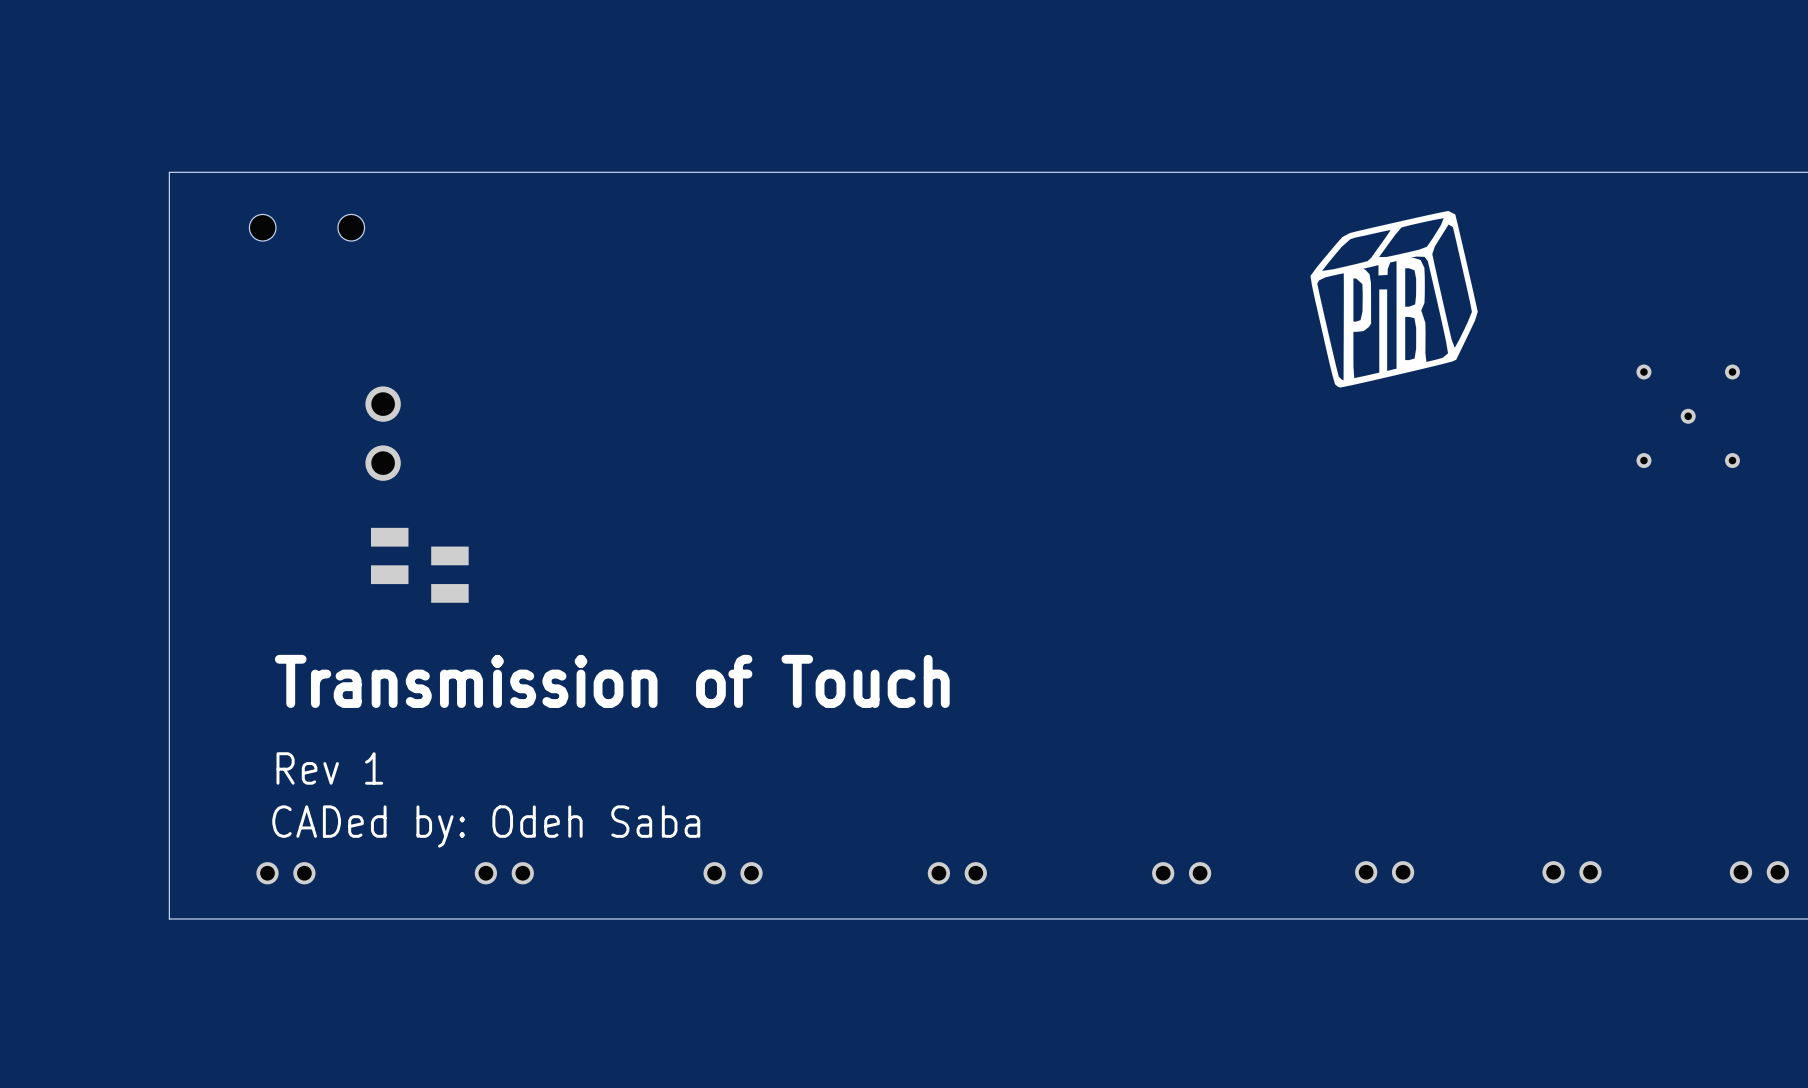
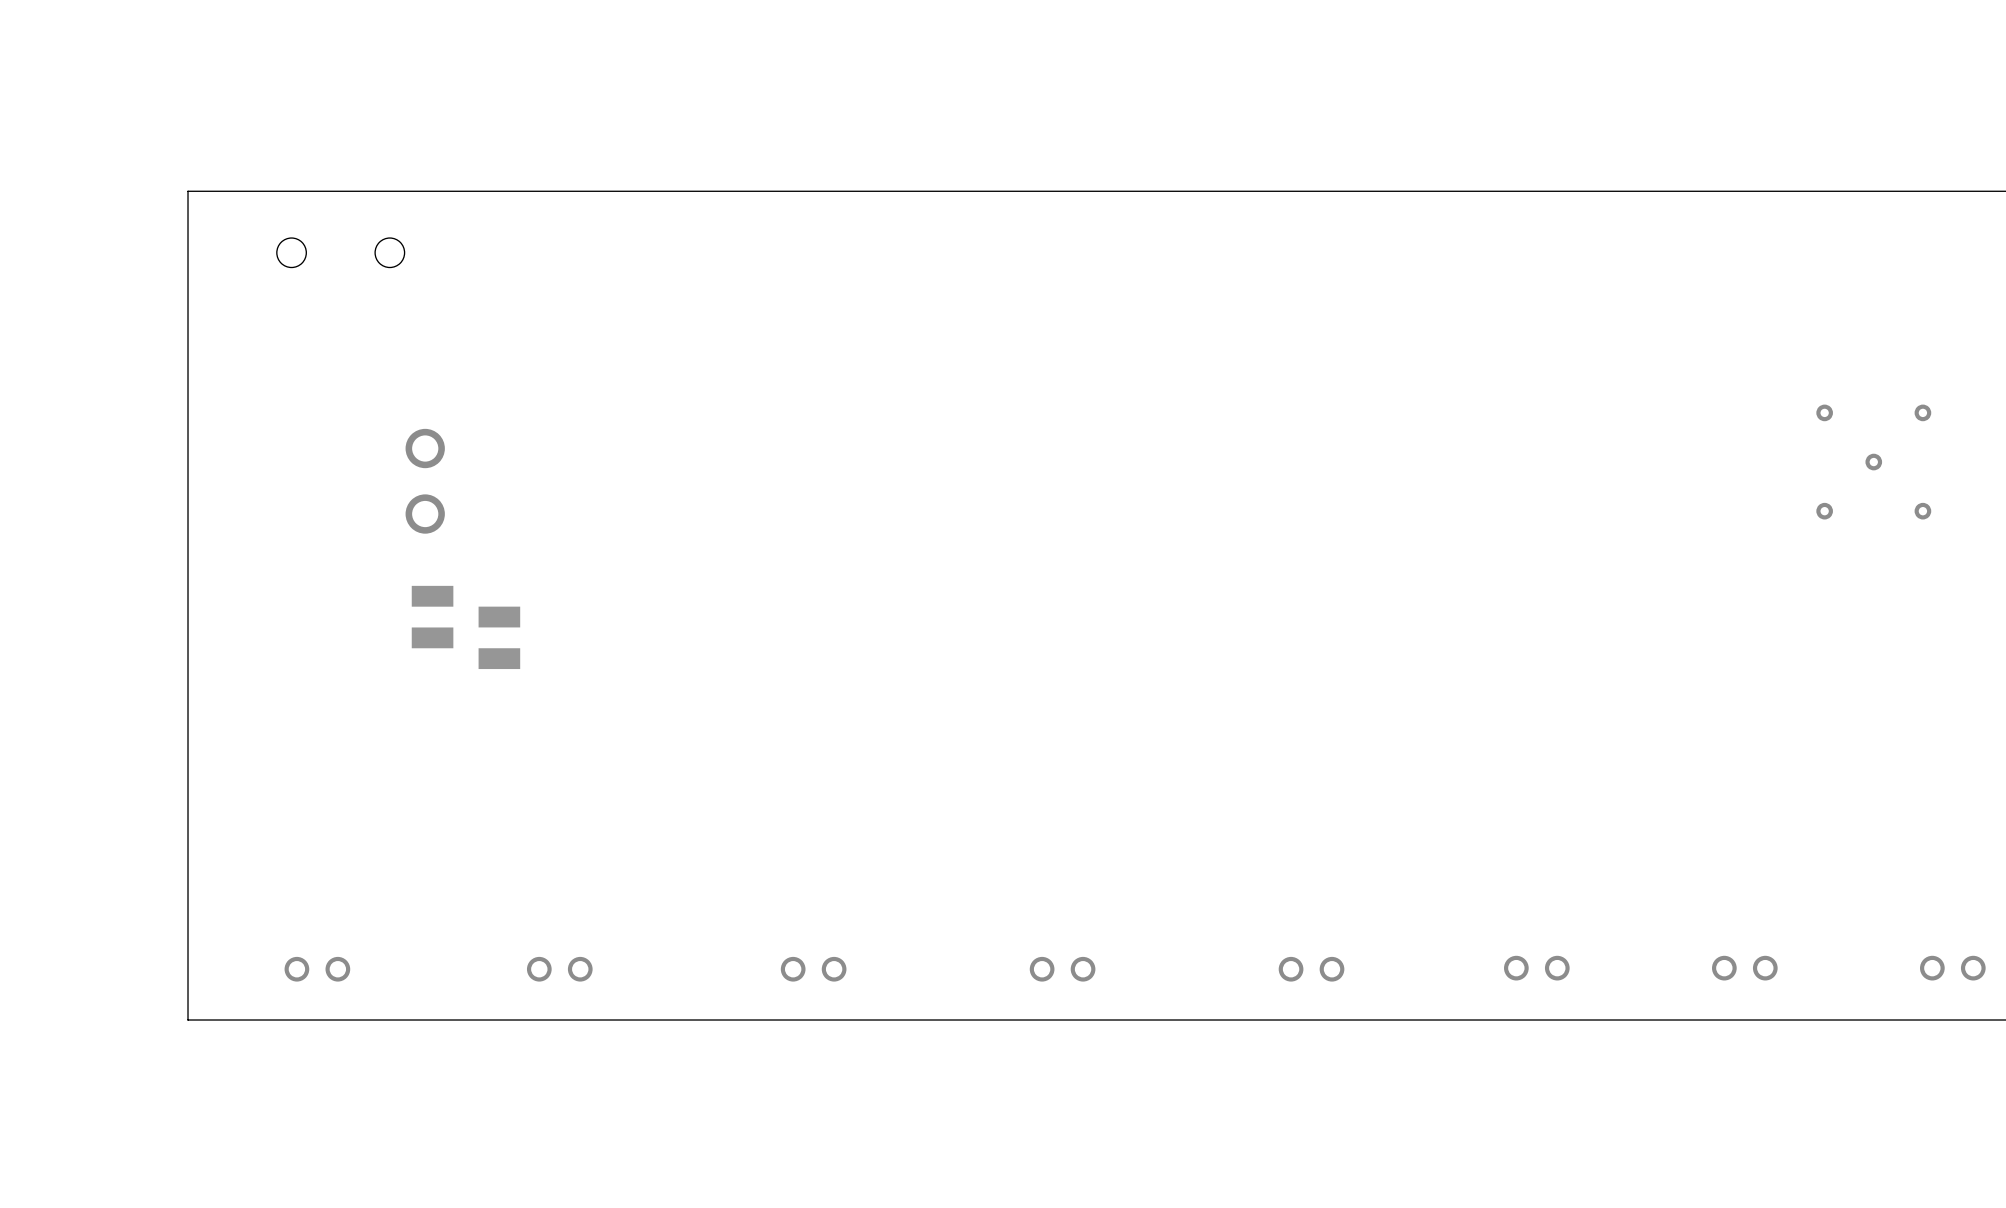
drawing: [1310, 210, 1478, 388] -> none
text: Transmission of Touch (612, 681) -> none
text: Rev 1 (329, 768) -> none
text: CADed by: Odeh Saba (486, 826) -> none

